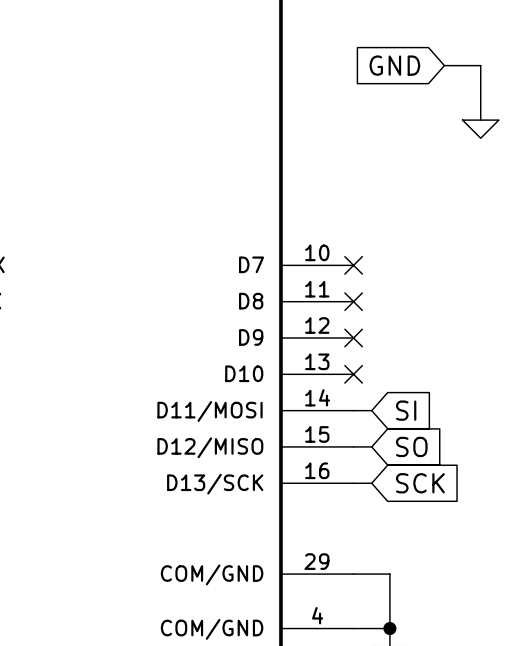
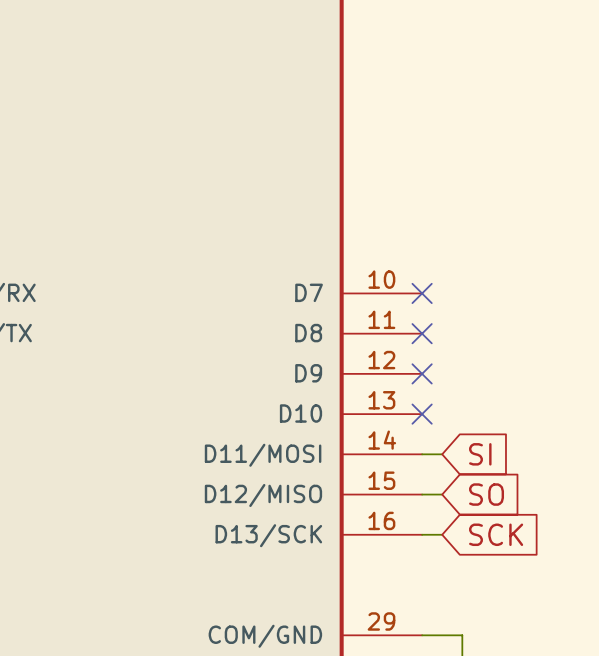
global label: GND (394, 65) -> none
wire: (444, 65) (480, 65) (480, 120) -> none
power symbol: (480, 129) -> none

